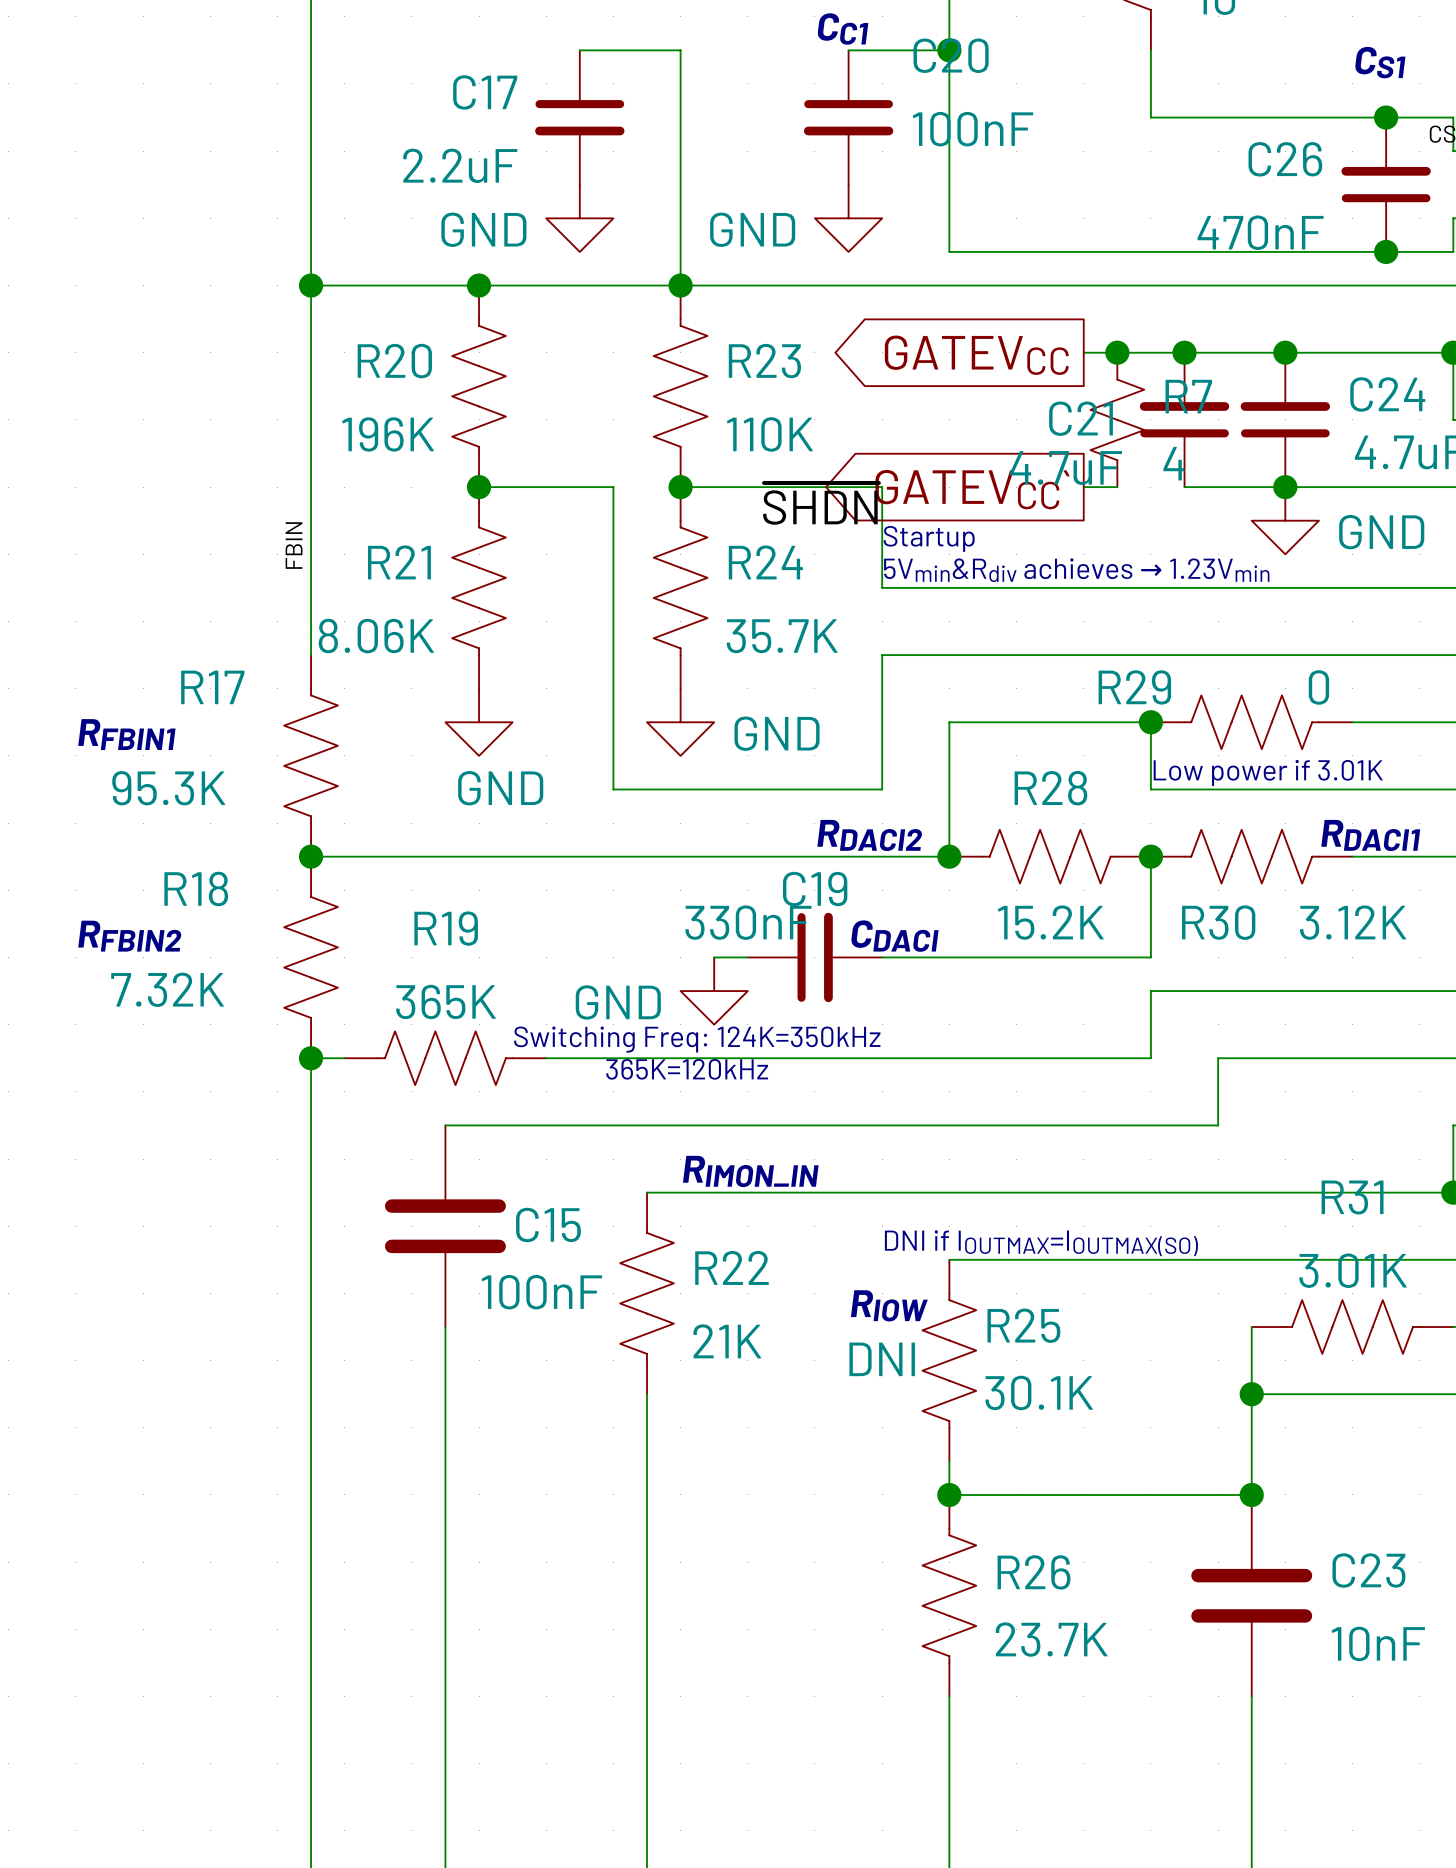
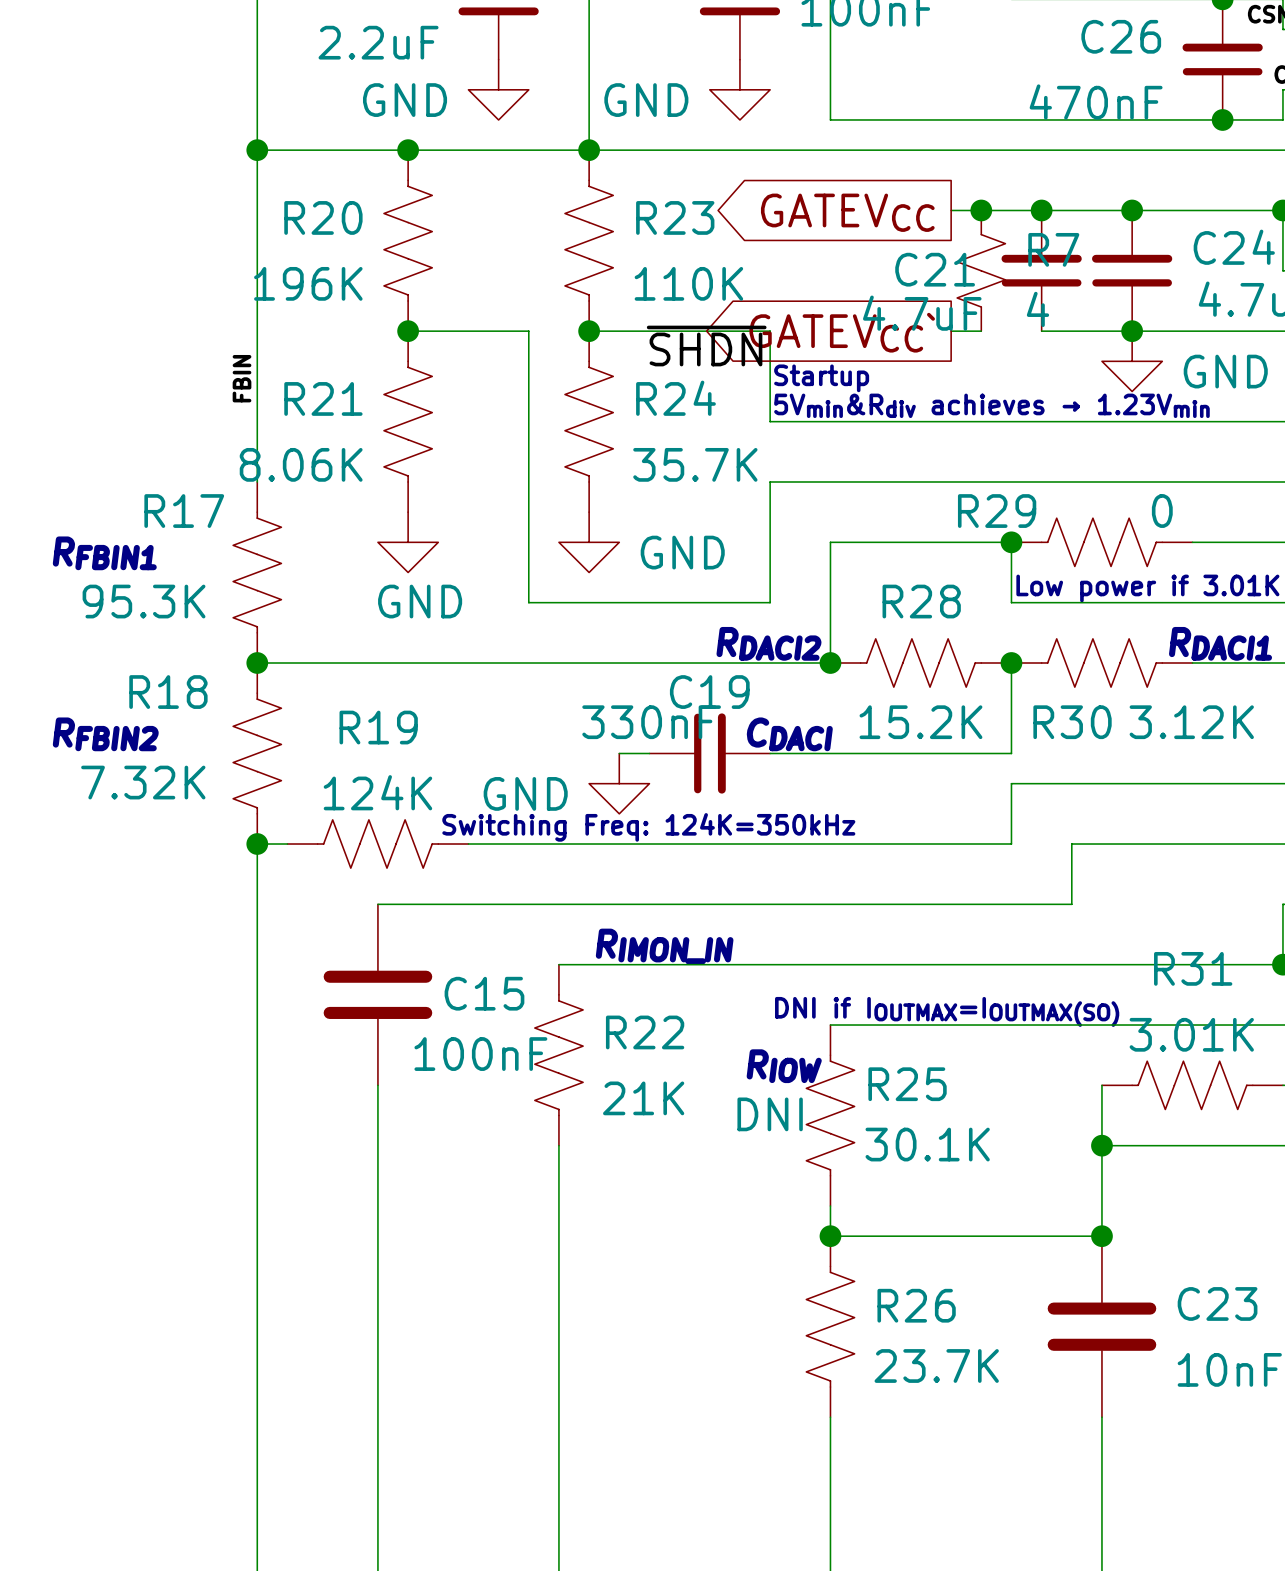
R19 value: 365K (445, 1001) -> 124K (377, 792)
text: 365K=120kHz (687, 1069) -> none

